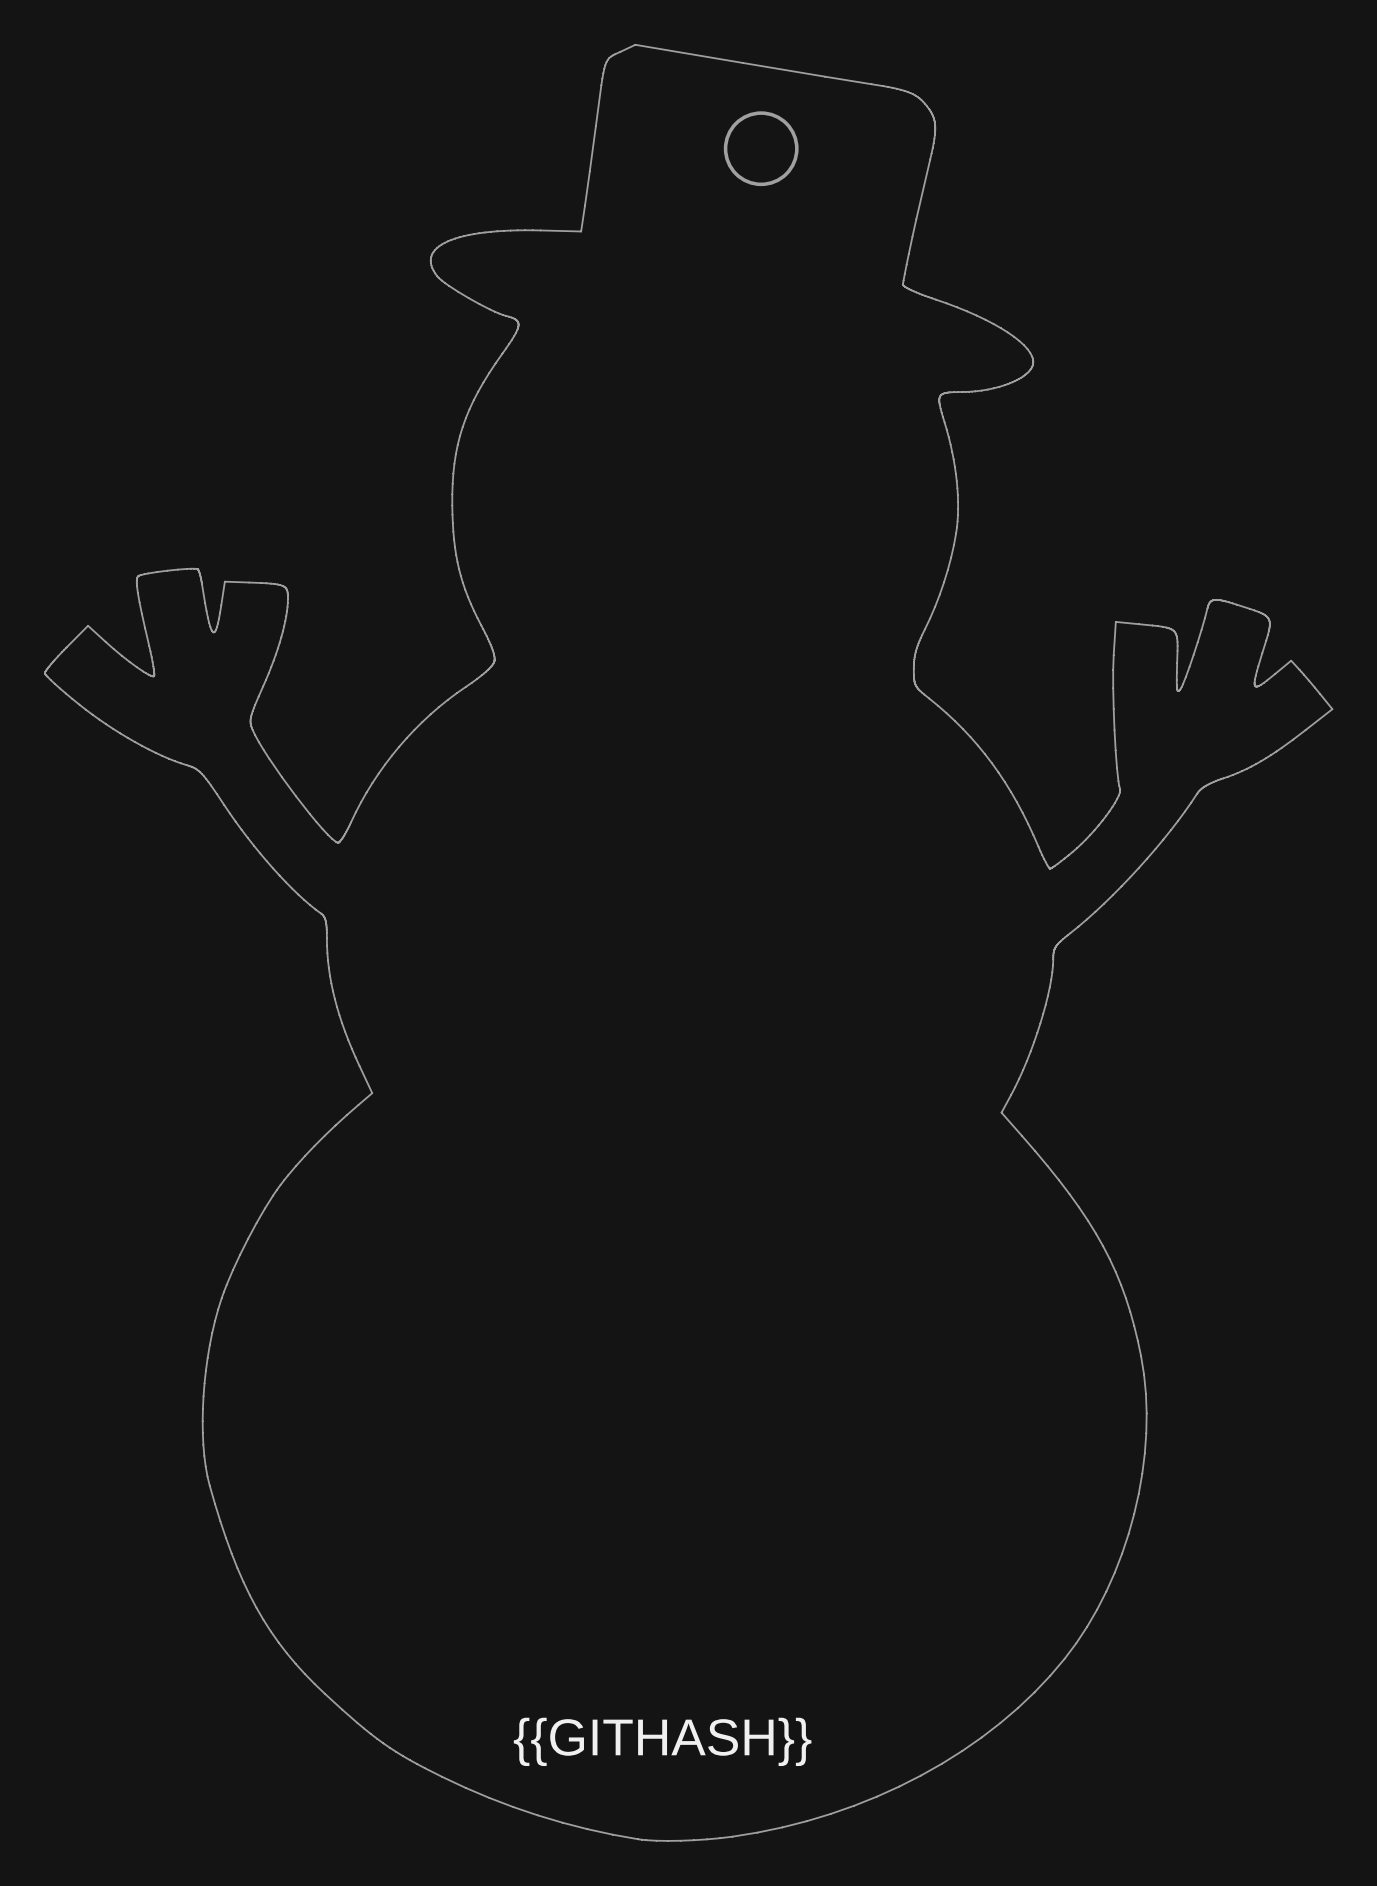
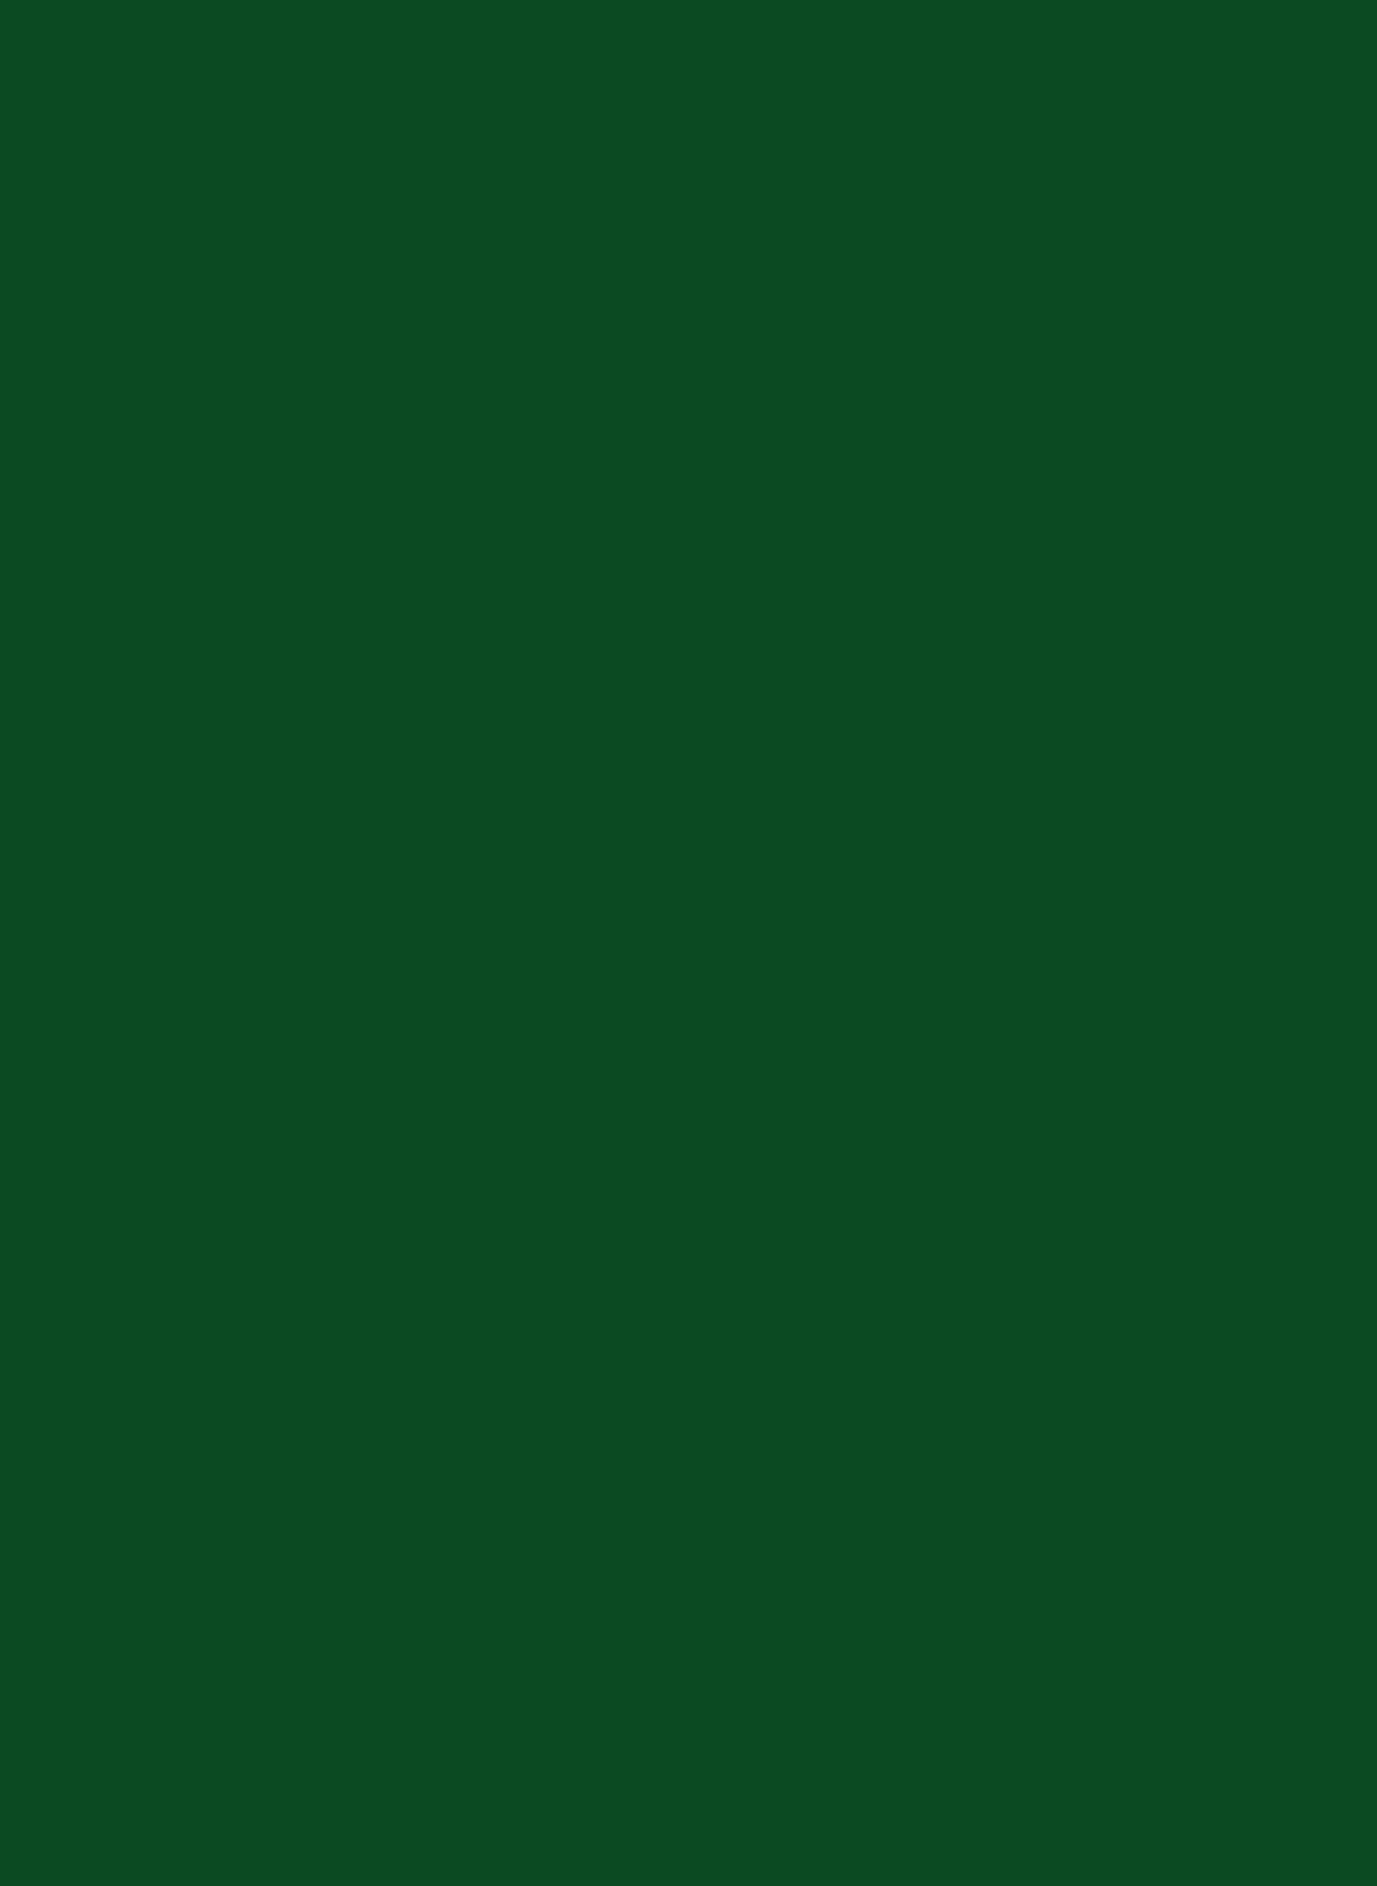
round board edge: [723, 111, 799, 187] -> none
board edge: (902, 284) (935, 132) (932, 115) (919, 98) (907, 91) (888, 87) (635, 44) (609, 58) (602, 78) (581, 231) (517, 230) (473, 234) (444, 242) (435, 249) (431, 256) (432, 268) (441, 280) (479, 304) (514, 319) (518, 323) (514, 336) (483, 382) (469, 409) (459, 435) (453, 473) (452, 523) (457, 562) (465, 589) (490, 644) (494, 660) (483, 673) (430, 714) (399, 746) (372, 783) (339, 842) -> none
board edge: (903, 285) (913, 291) (967, 311) (993, 323) (1019, 340) (1027, 348) (1032, 358) (1032, 364) (1028, 371) (1010, 383) (981, 390) (945, 392) (939, 396) (939, 405) (955, 474) (957, 521) (953, 545) (944, 582) (916, 650) (913, 674) (914, 683) (918, 689) (962, 728) (998, 772) (1022, 812) (1049, 868) -> none
board edge: (197, 569) (167, 570) (137, 576) (137, 593) (154, 675) -> none
board edge: (198, 569) (209, 622) (213, 632) (217, 623) (224, 581) (274, 584) (282, 585) (286, 589) (287, 606) (282, 631) (273, 660) (252, 711) (250, 724) (263, 750) (296, 796) (322, 828) (338, 842) -> none
board edge: (44, 672) (88, 625) (129, 661) (153, 676) -> none
board edge: (44, 673) (72, 698) (113, 728) (155, 752) (198, 770) (266, 861) (298, 894) (323, 915) (326, 925) (330, 975) (337, 1007) (351, 1048) (372, 1093) (314, 1145) (273, 1195) (256, 1223) (232, 1270) (221, 1298) (212, 1333) (205, 1370) (202, 1408) (205, 1466) (225, 1537) (243, 1582) (256, 1607) (278, 1642) (314, 1684) (370, 1733) (409, 1760) (465, 1787) (537, 1815) (612, 1834) (642, 1839) (668, 1840) (732, 1836) (806, 1821) (877, 1796) (942, 1763) (1000, 1723) (1050, 1675) (1087, 1626) (1114, 1572) (1134, 1514) (1144, 1453) (1145, 1393) (1141, 1355) (1134, 1326) (1115, 1271) (1087, 1220) (1047, 1166) (1001, 1112) (1023, 1070) (1037, 1032) (1047, 996) (1053, 952) (1056, 945) (1104, 903) (1138, 868) (1170, 830) (1200, 789) (1266, 758) (1332, 709) (1291, 660) (1263, 682) (1255, 686) (1255, 675) (1269, 628) (1269, 620) (1258, 612) (1219, 600) (1212, 600) (1208, 604) (1189, 666) (1178, 691) -> none
board edge: (1177, 690) (1177, 641) (1174, 631) (1162, 626) (1115, 621) (1113, 708) (1119, 792) (1109, 811) (1090, 835) (1072, 852) (1050, 868) -> none
text: {{GITHASH}} (662, 1741) -> none

